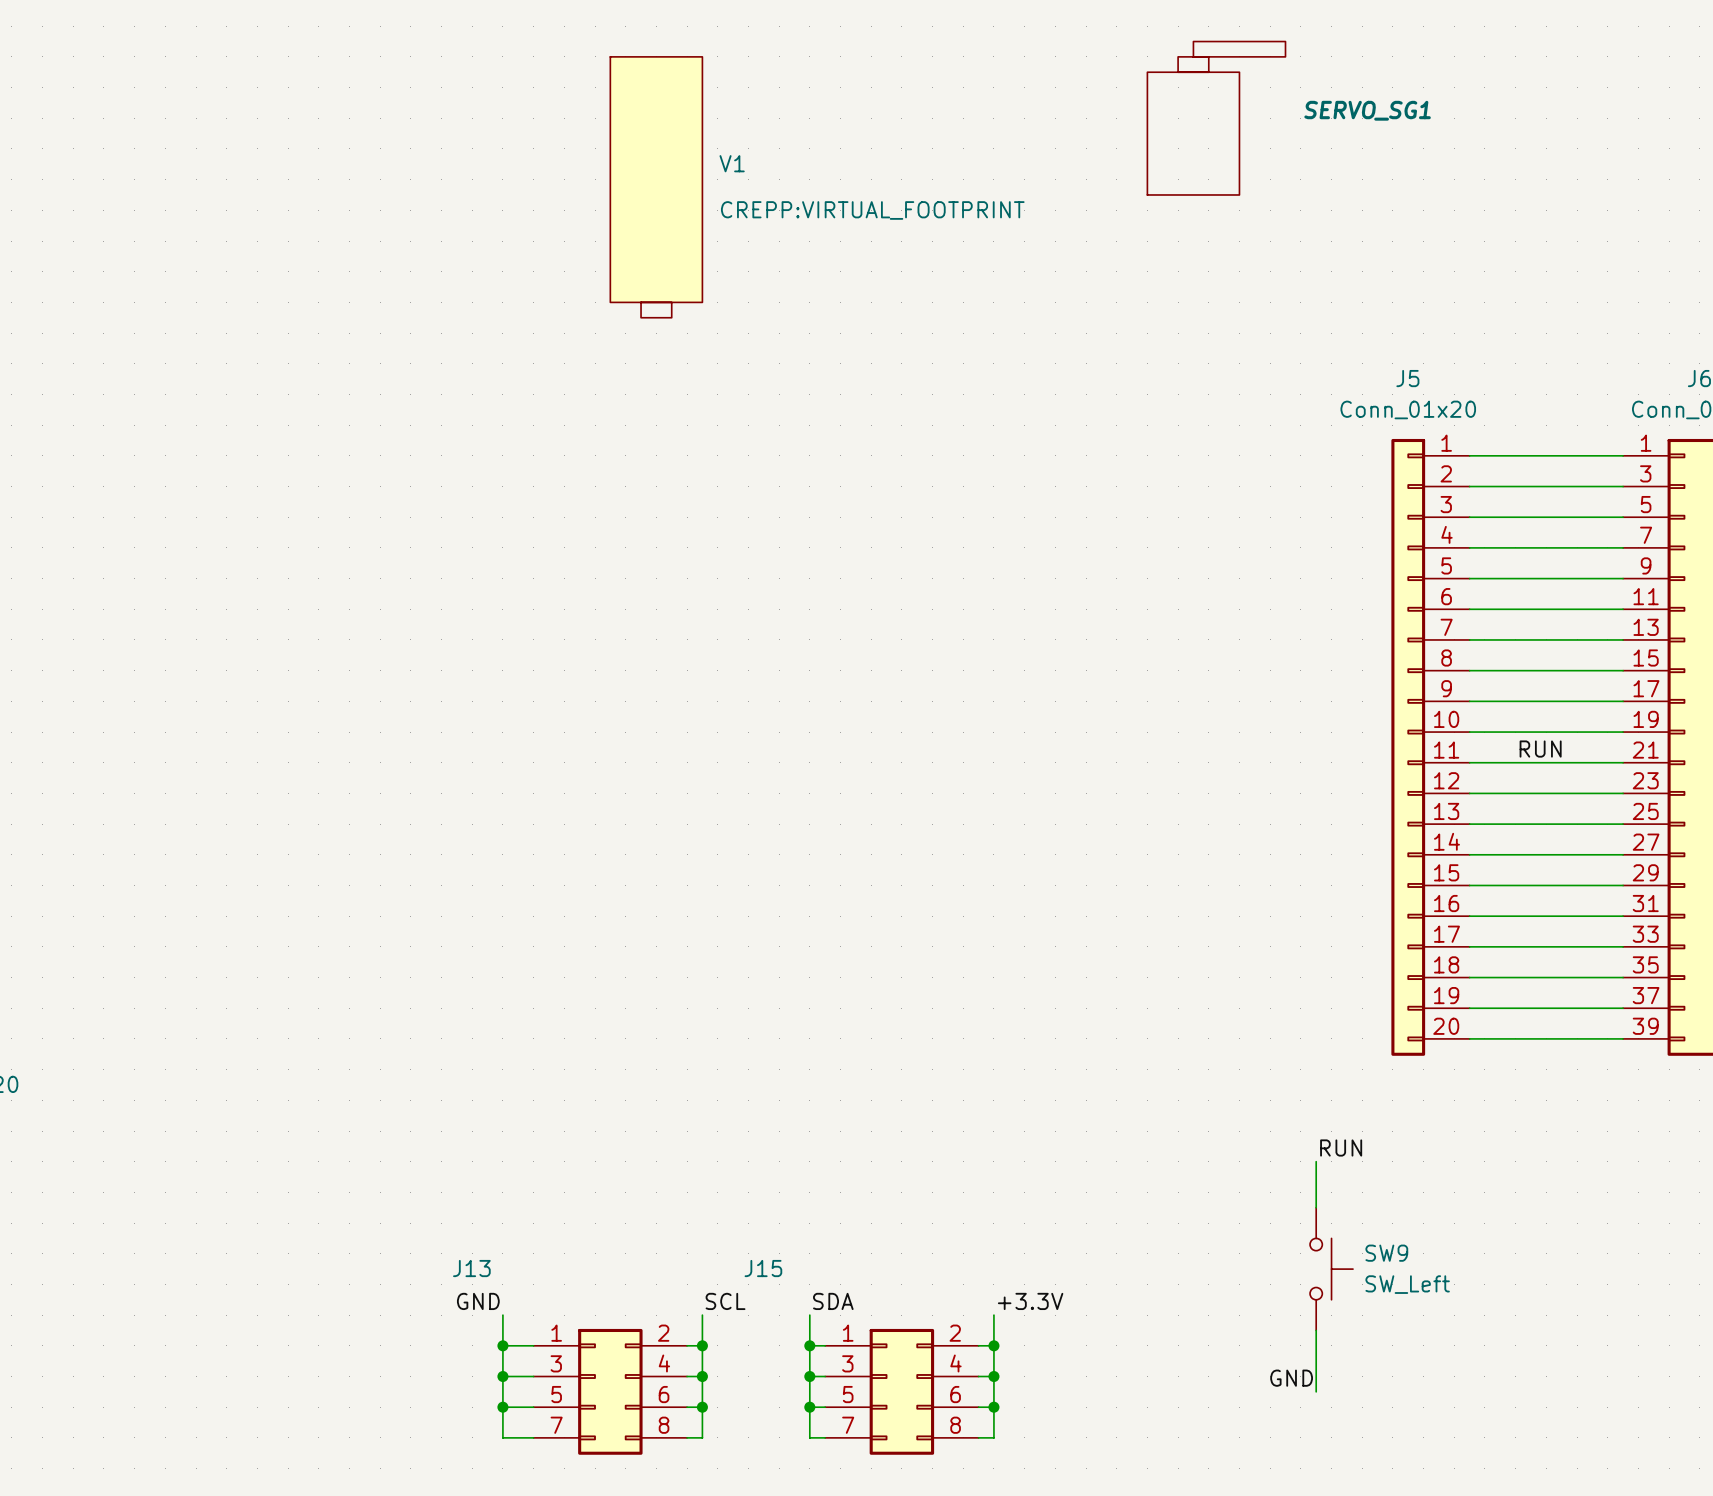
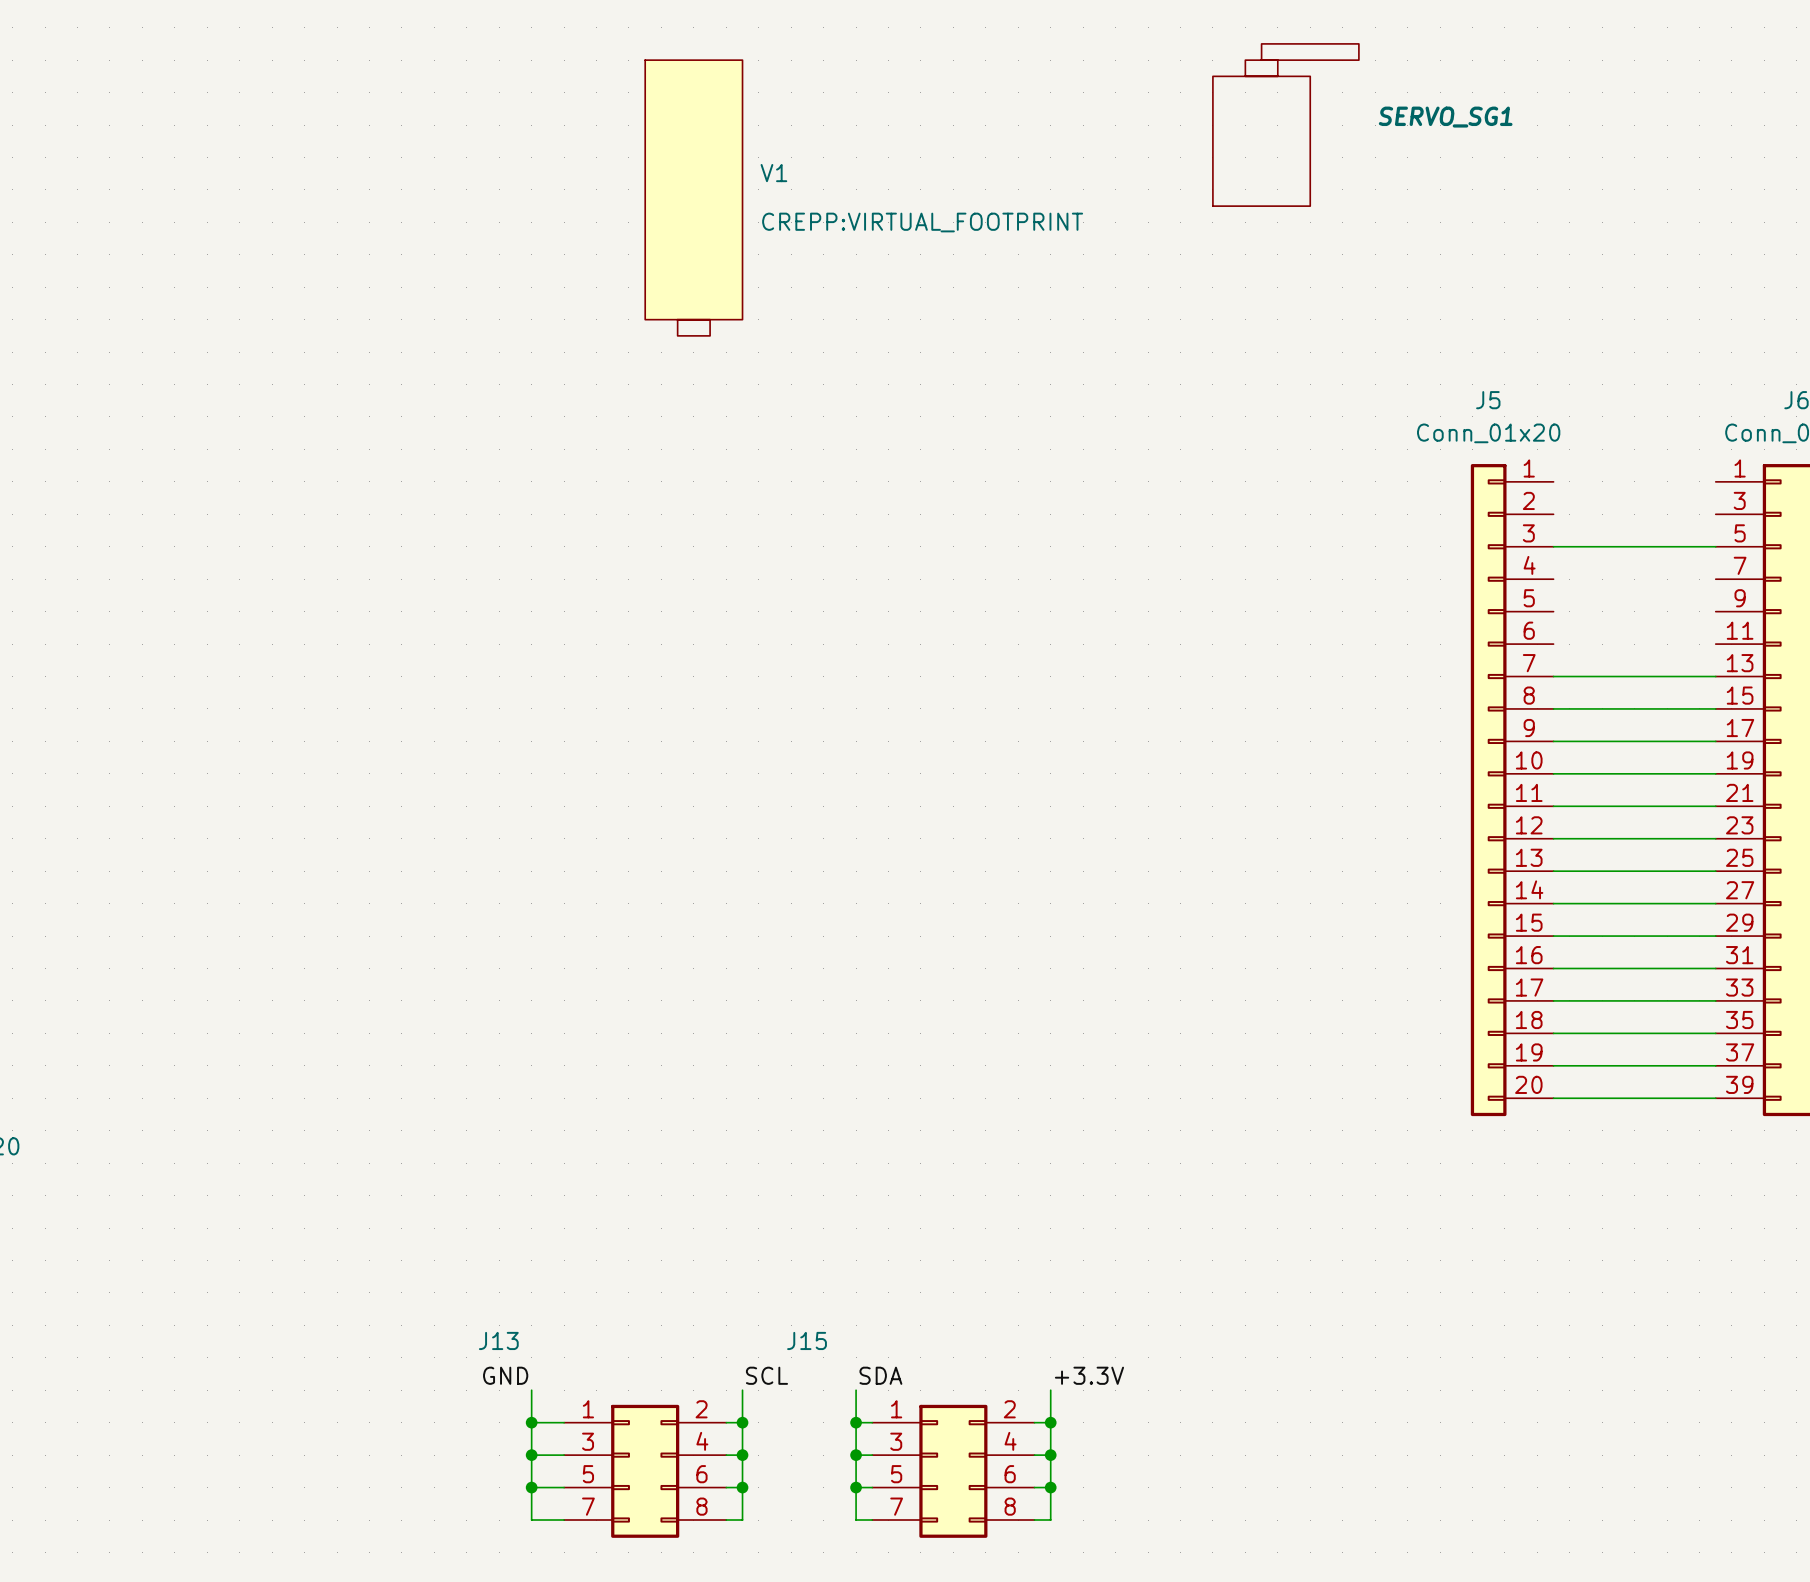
wire: (1469, 455) (1623, 455) -> none
wire: (1469, 486) (1623, 486) -> none
wire: (1469, 547) (1623, 547) -> none
wire: (1469, 578) (1623, 578) -> none
wire: (1469, 609) (1623, 609) -> none
label: RUN (1540, 749) -> none
label: RUN (1341, 1147) -> none
wire: (1316, 1161) (1316, 1207) -> none
SW9: SW_Left (1331, 1269) -> none
wire: (1316, 1330) (1316, 1391) -> none
label: GND (1291, 1378) -> none

